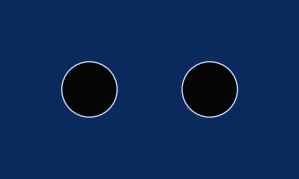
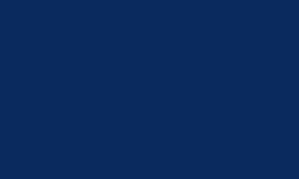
part: (89, 89) -> none
part: (209, 89) -> none

